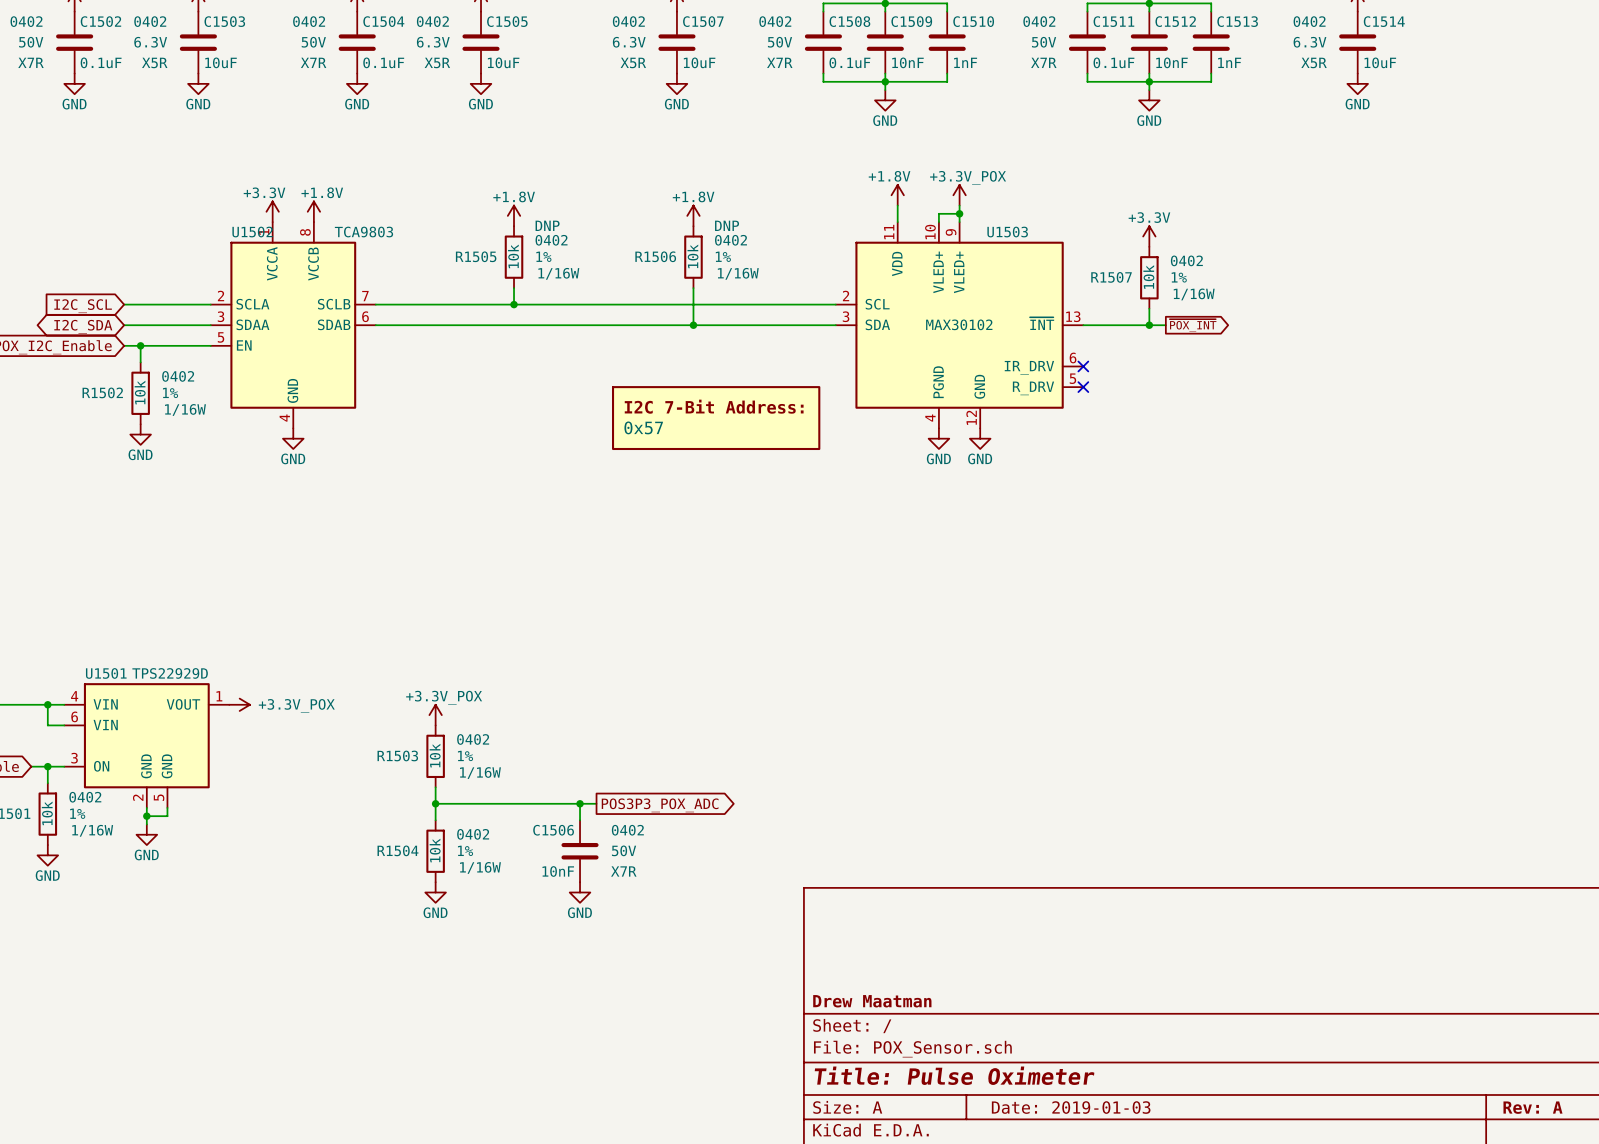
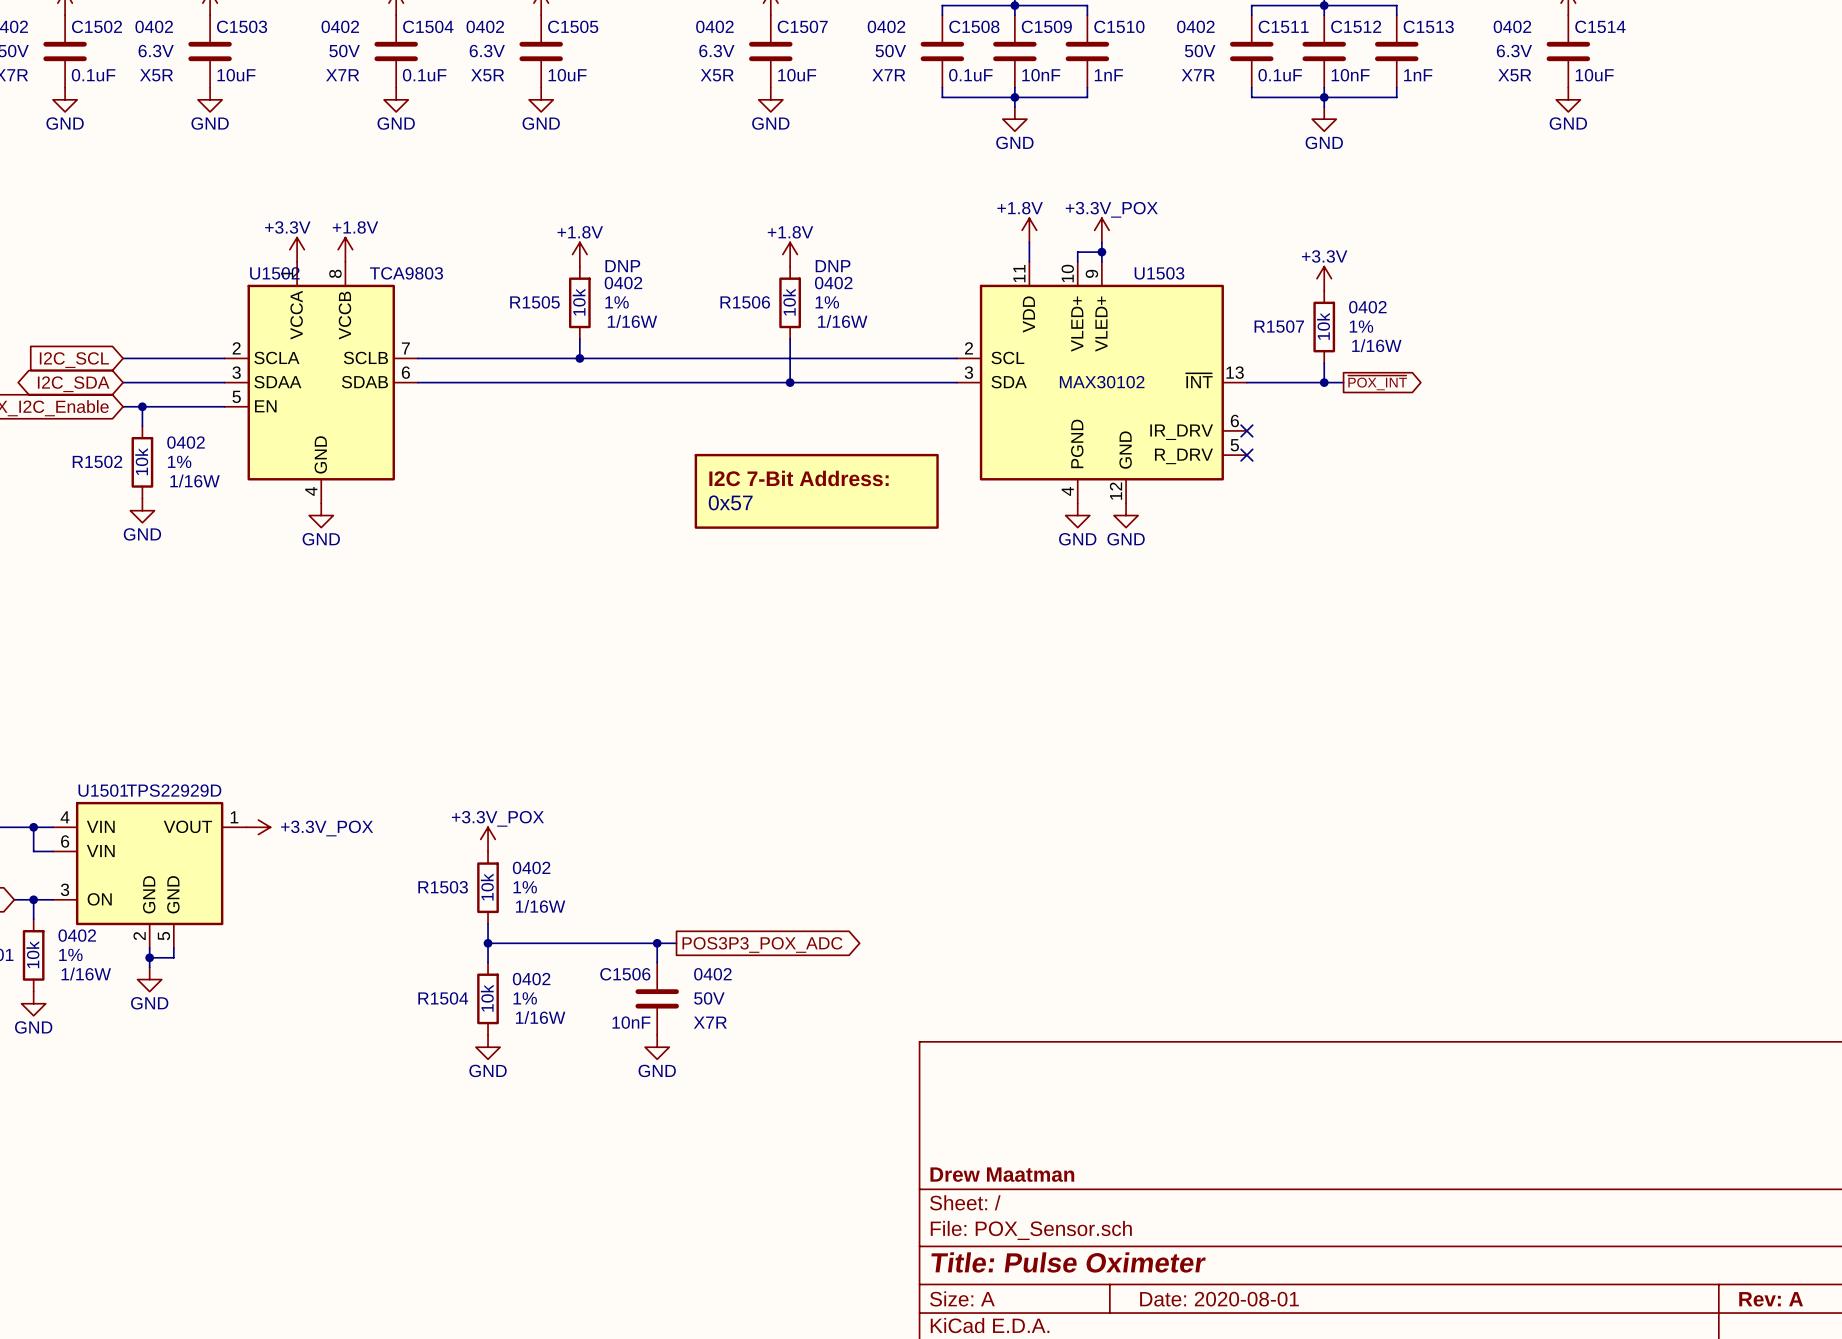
title block: Date: 2019-01-03 (1071, 1107) -> Date: 2020-08-01 (1219, 1299)

